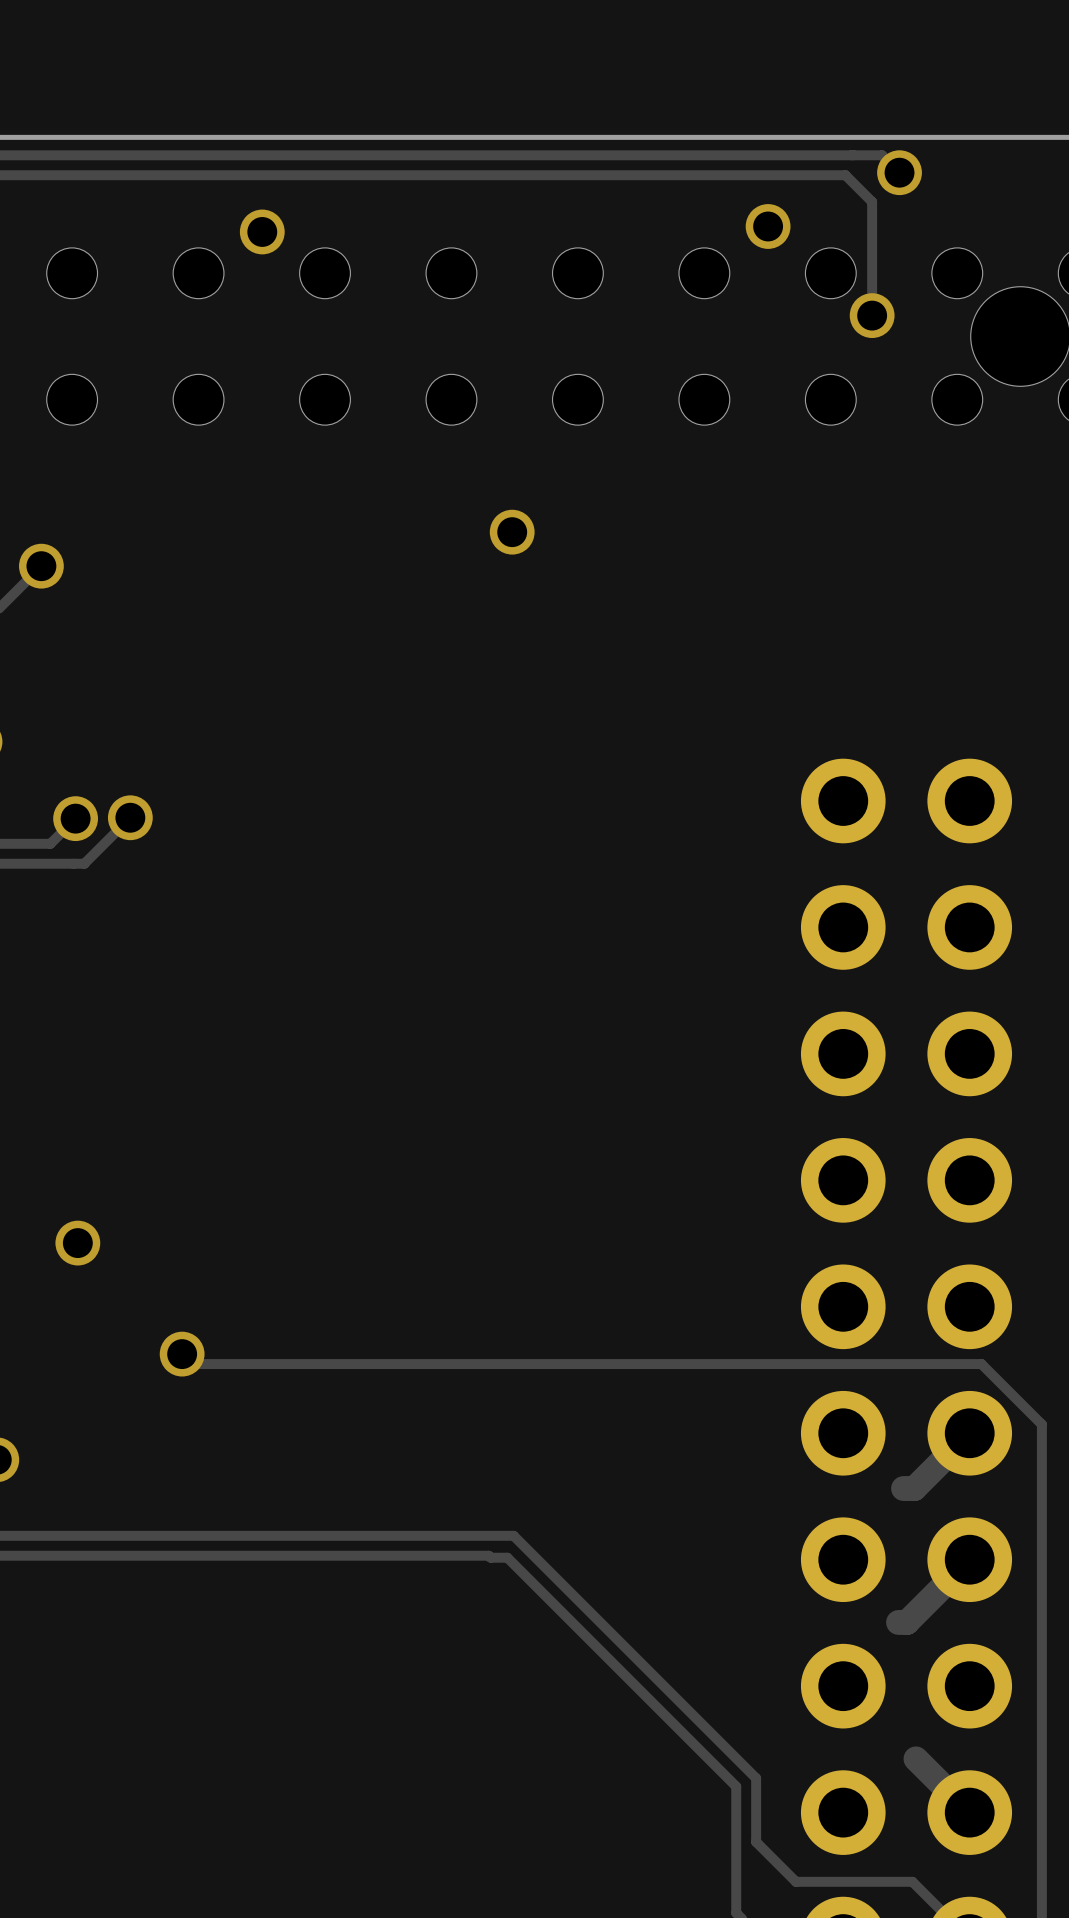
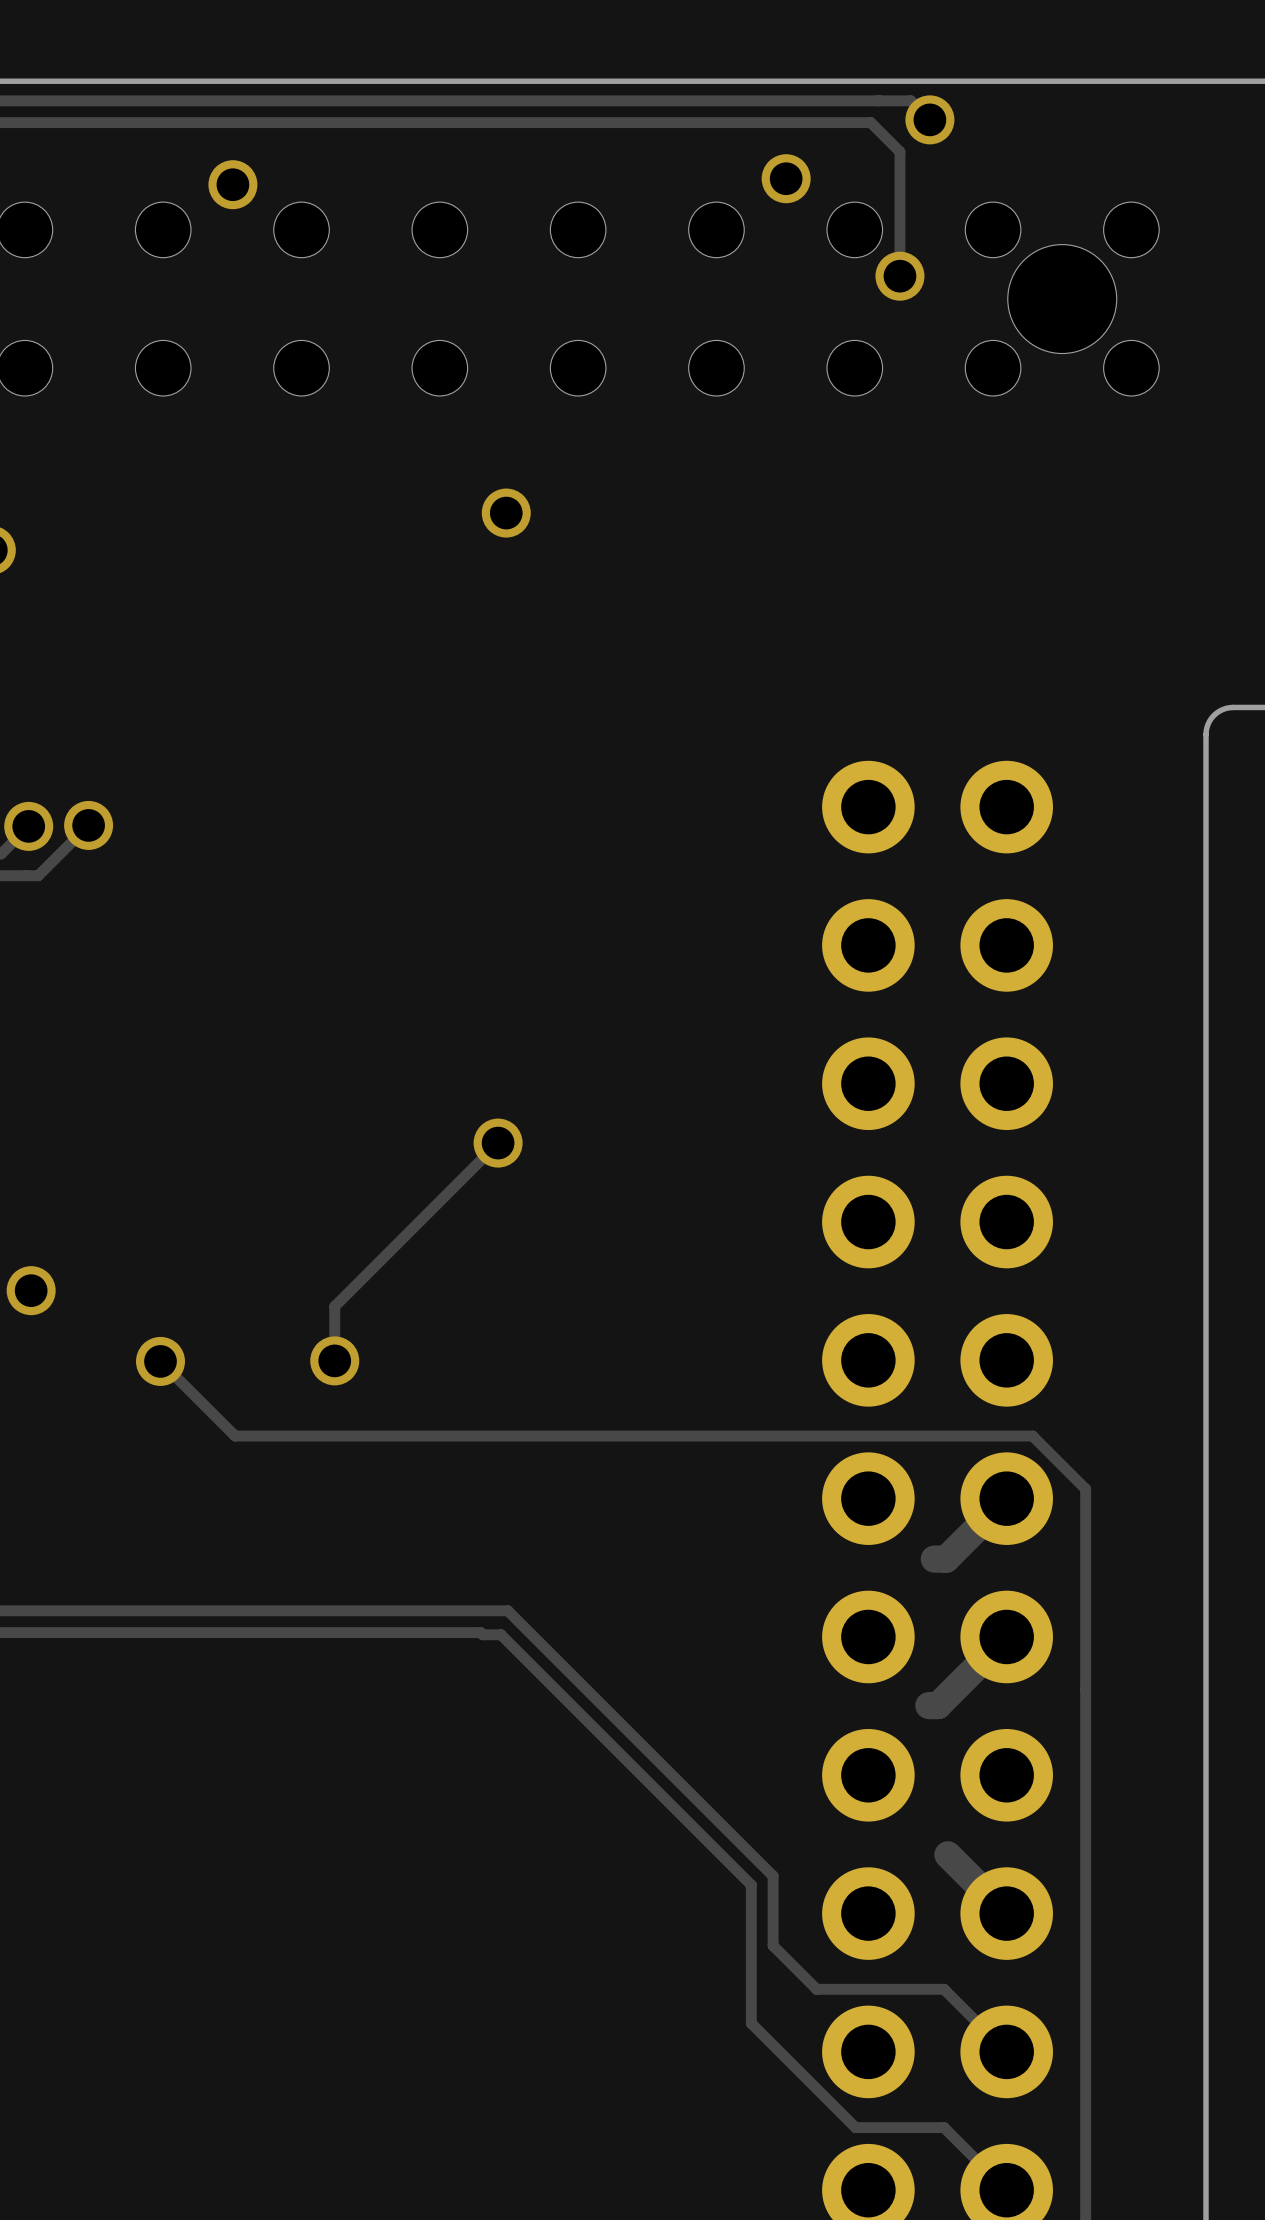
track: none -> (498, 1143) (334, 1306) (334, 1360)
via: none -> (498, 1143)
via: none -> (334, 1360)
track: (182, 1354) (192, 1364) (981, 1364) (993, 1376) -> (160, 1361) (235, 1436) (1032, 1436)
via position: (182, 1354) -> (160, 1361)

